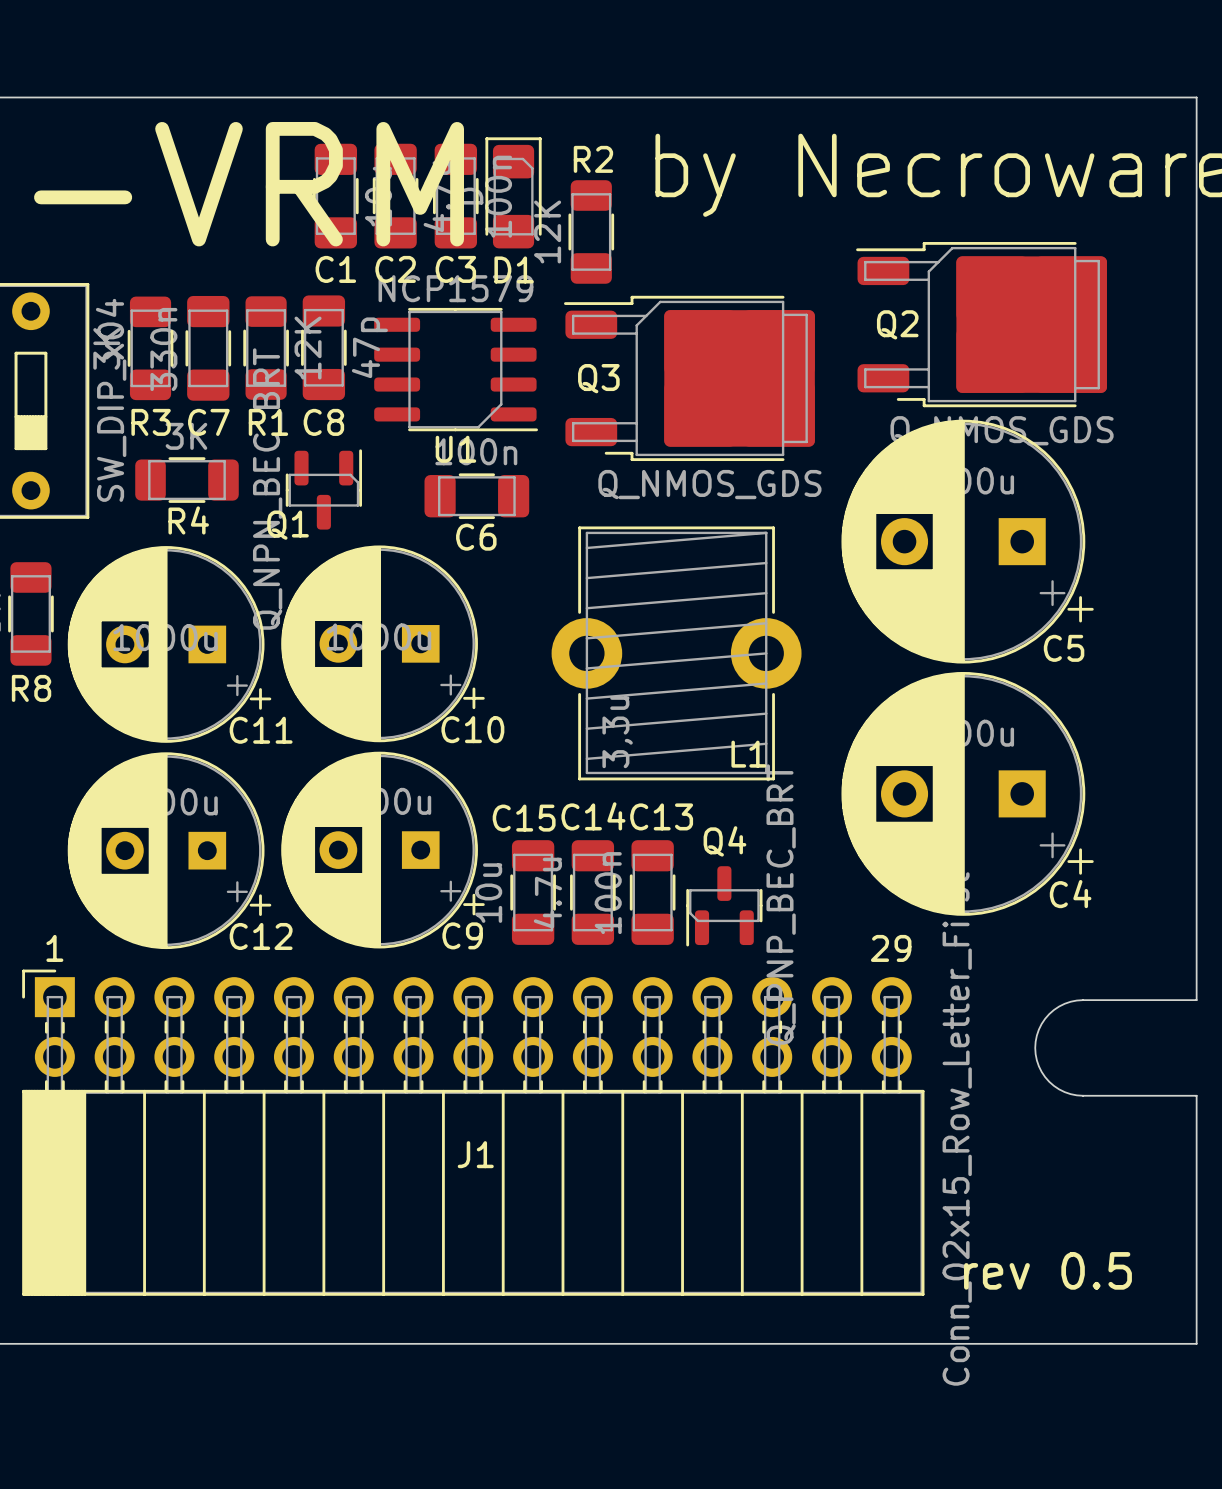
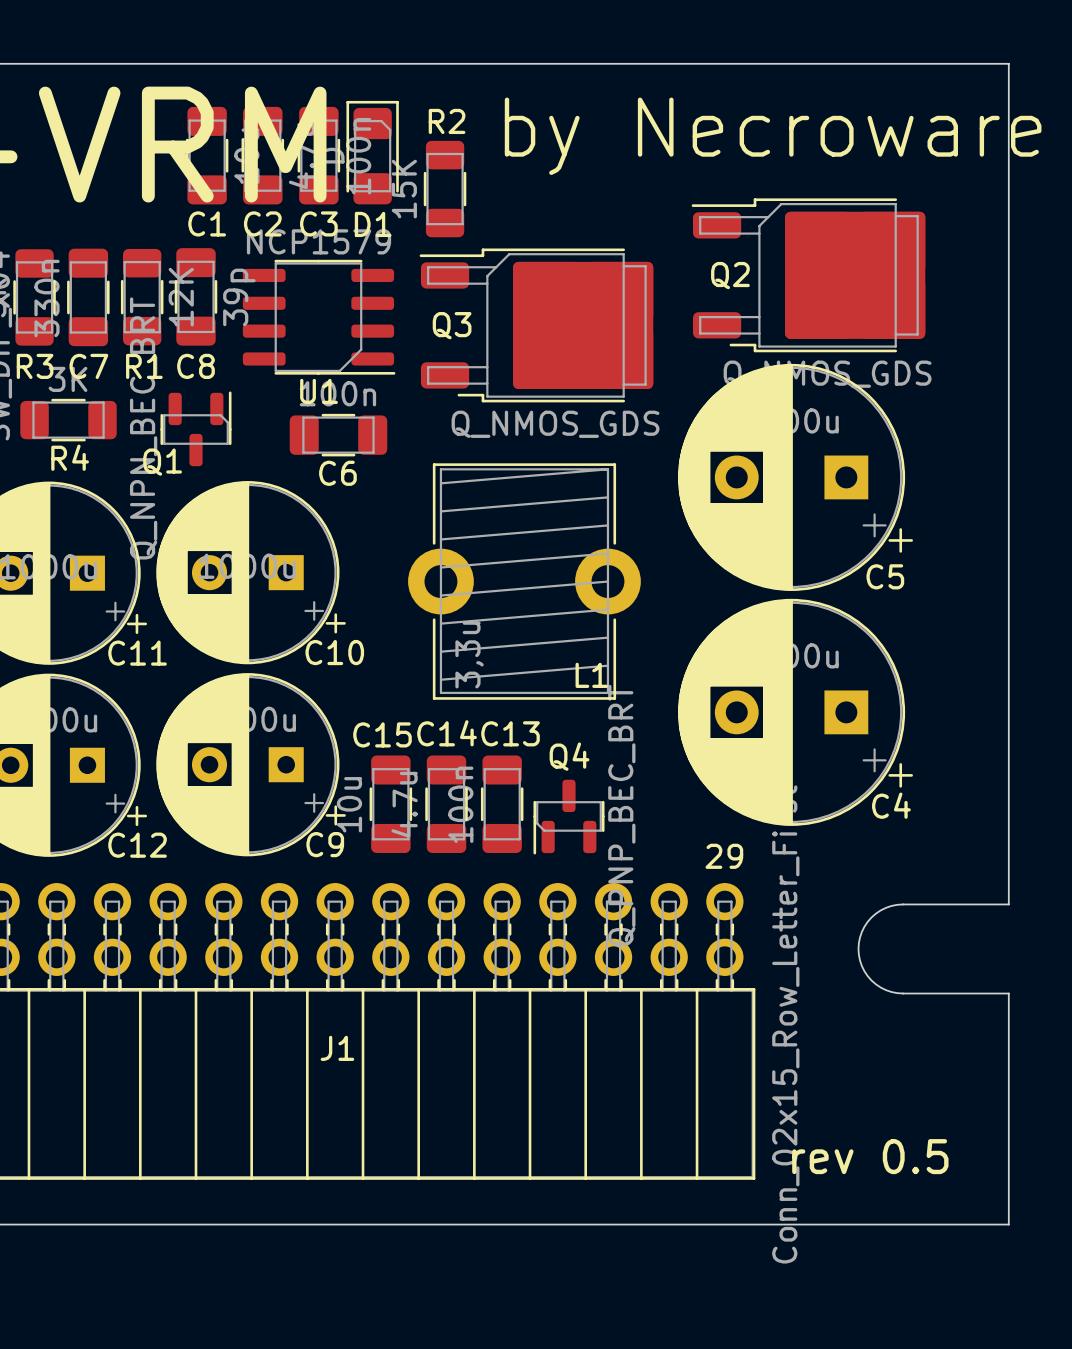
R2 value: 12K (547, 231) -> 15K (404, 189)
C8 value: 47p (369, 347) -> 39p (239, 297)

